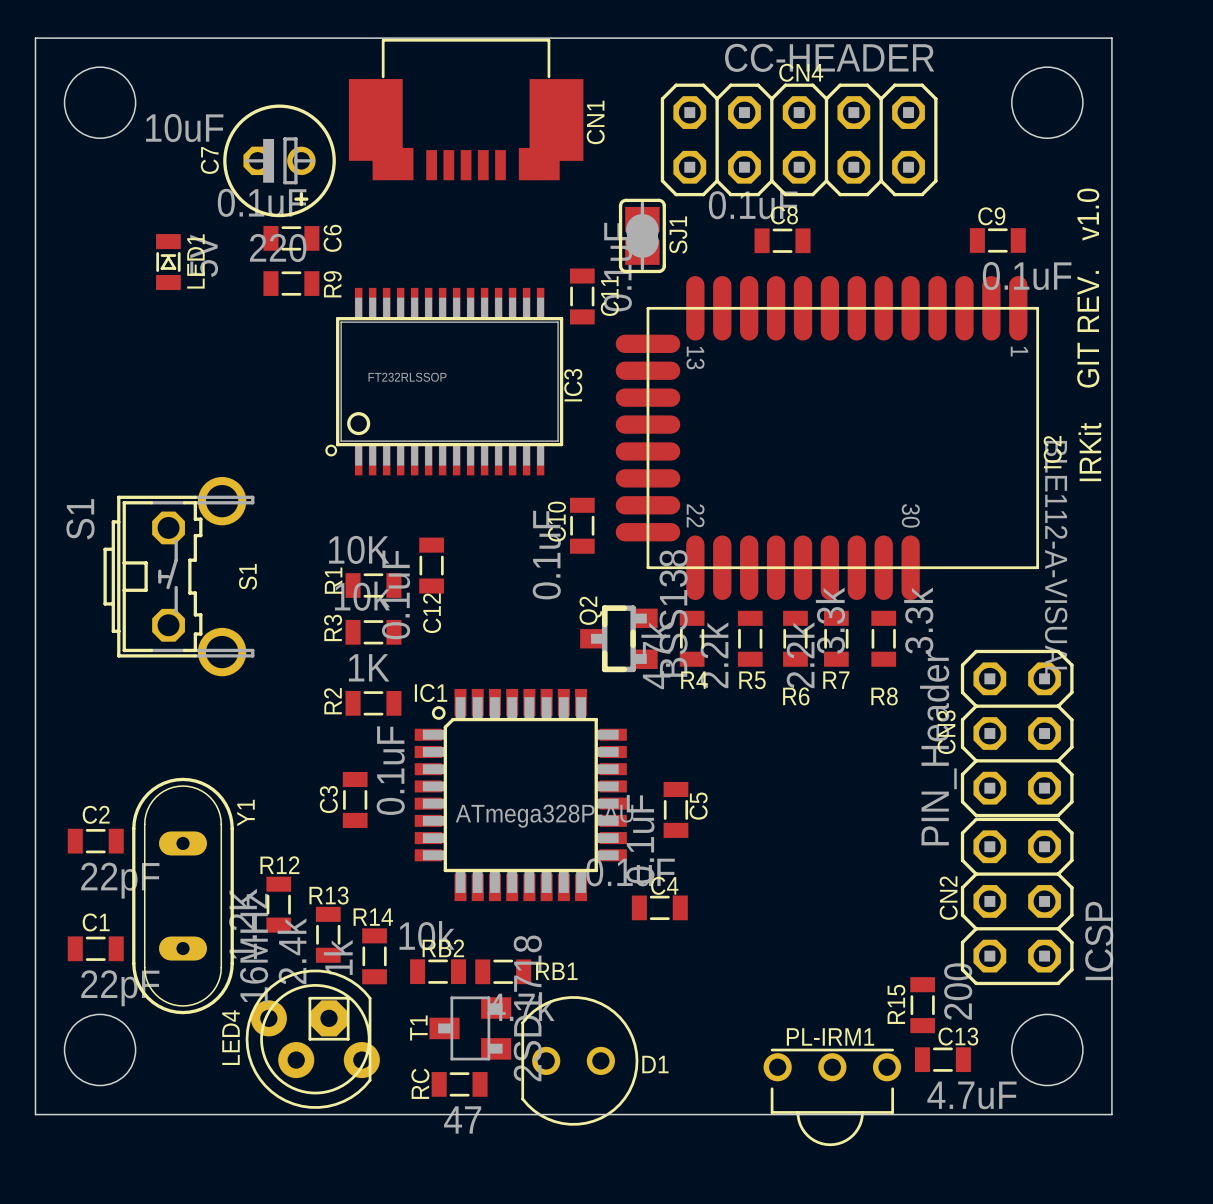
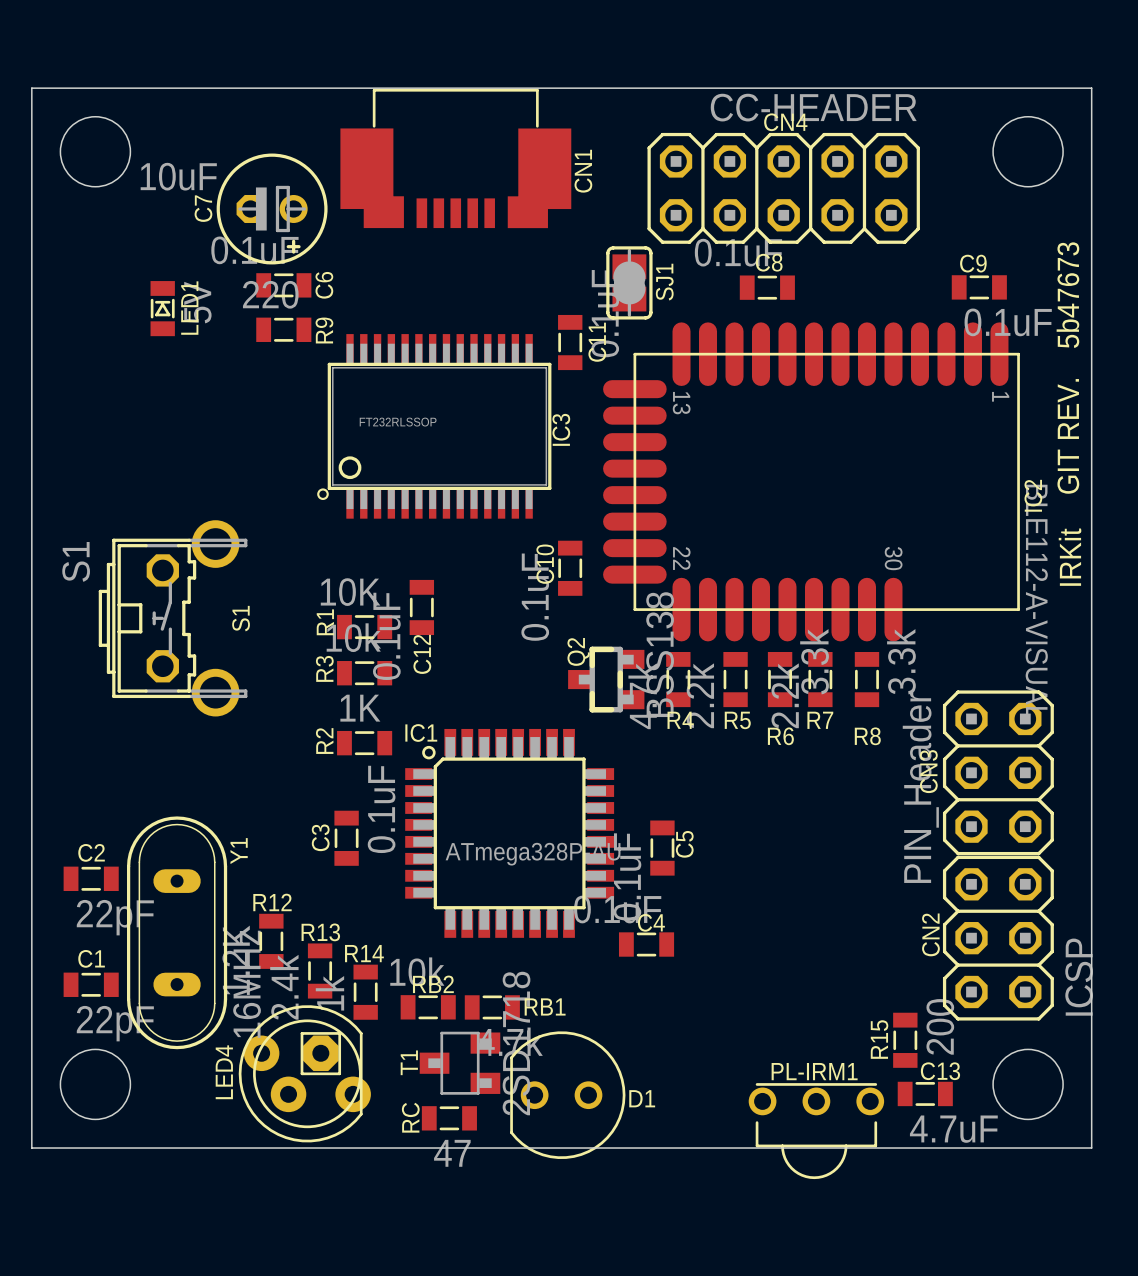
drawing: [1077, 188, 1100, 388] -> none
drawing: none -> [1056, 242, 1080, 494]
text position: IRKit (1089, 452) -> IRKit (1070, 557)

